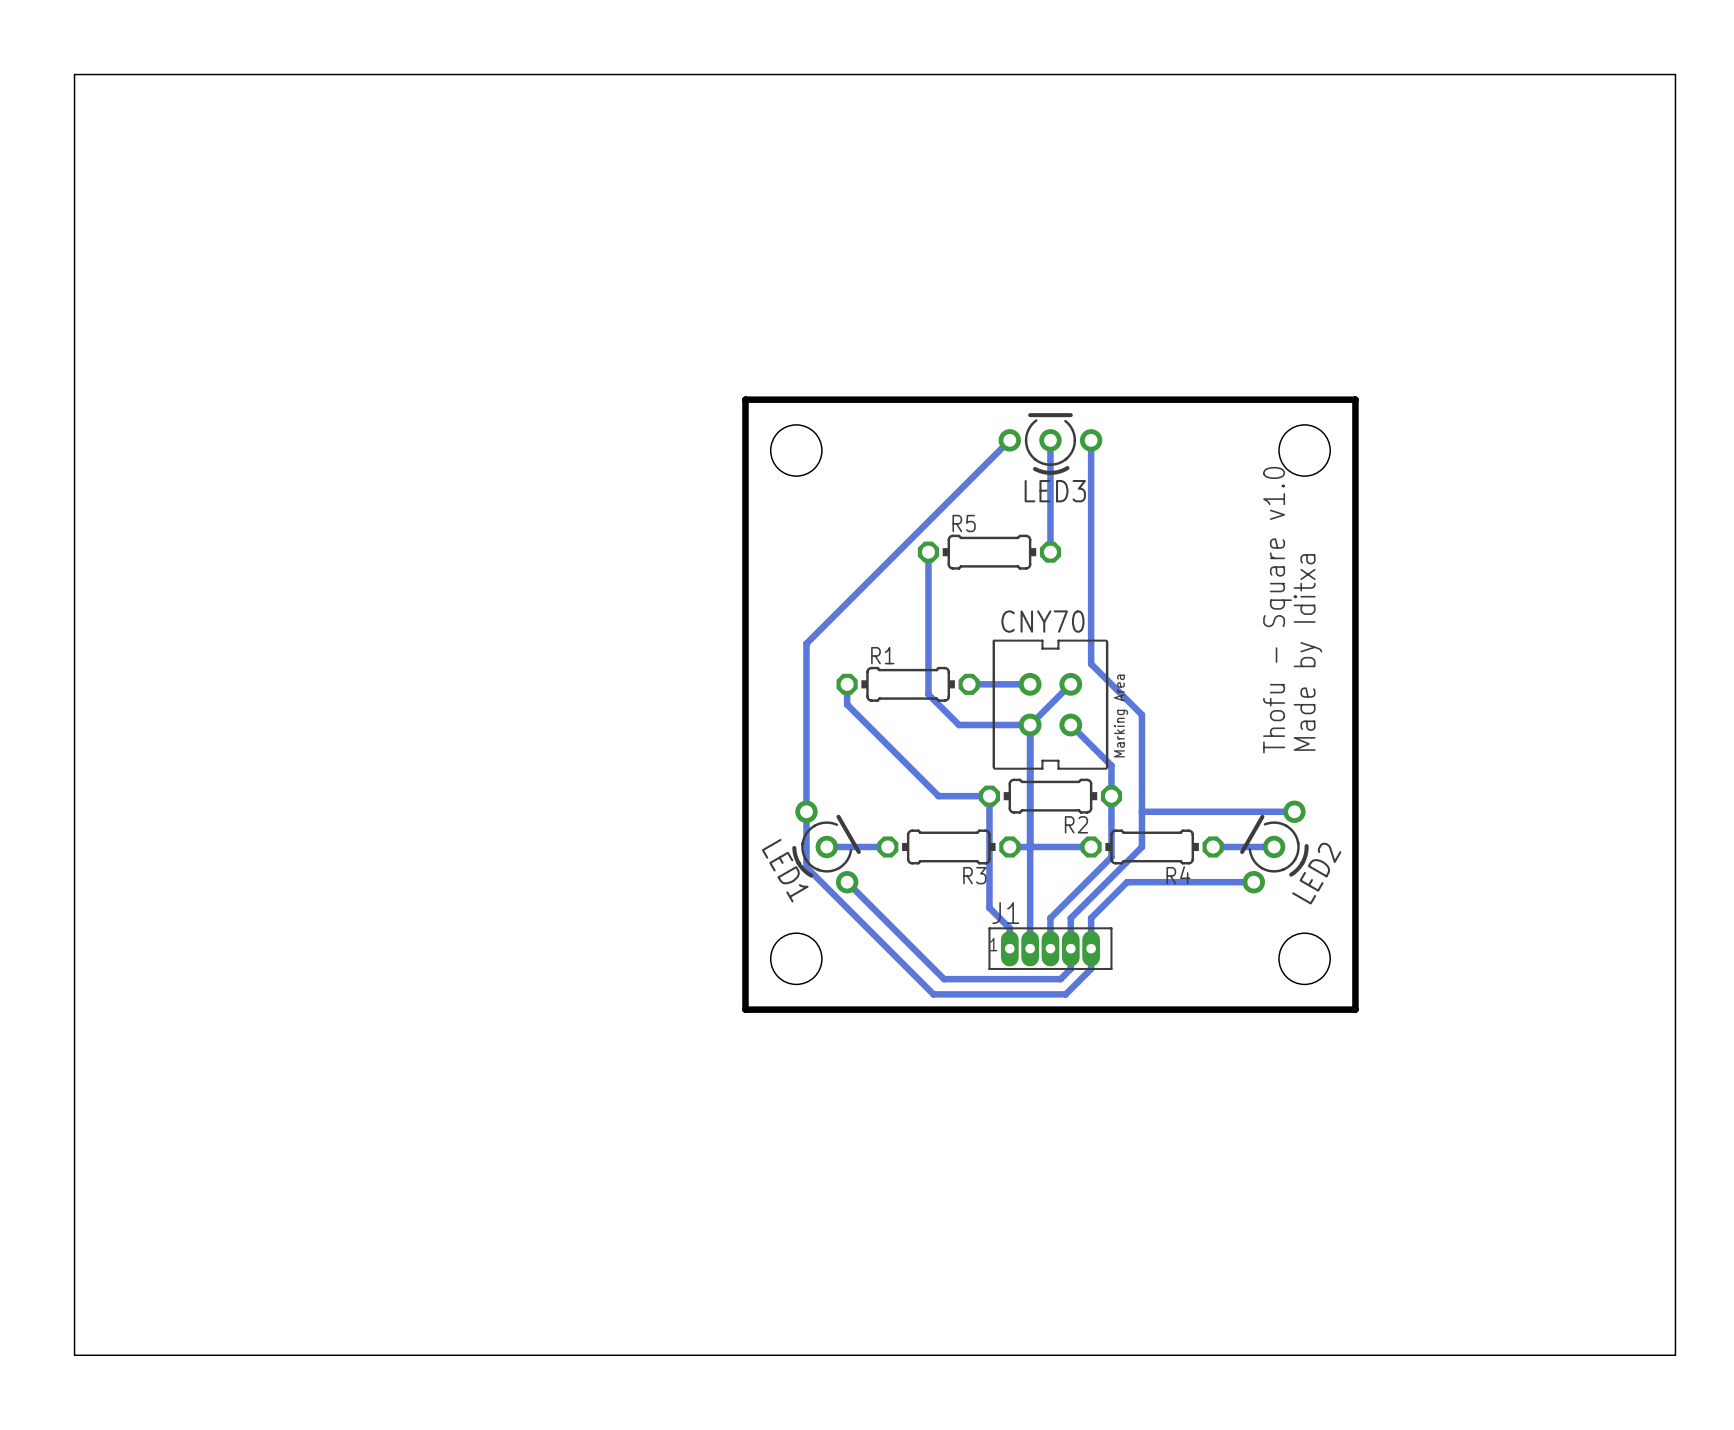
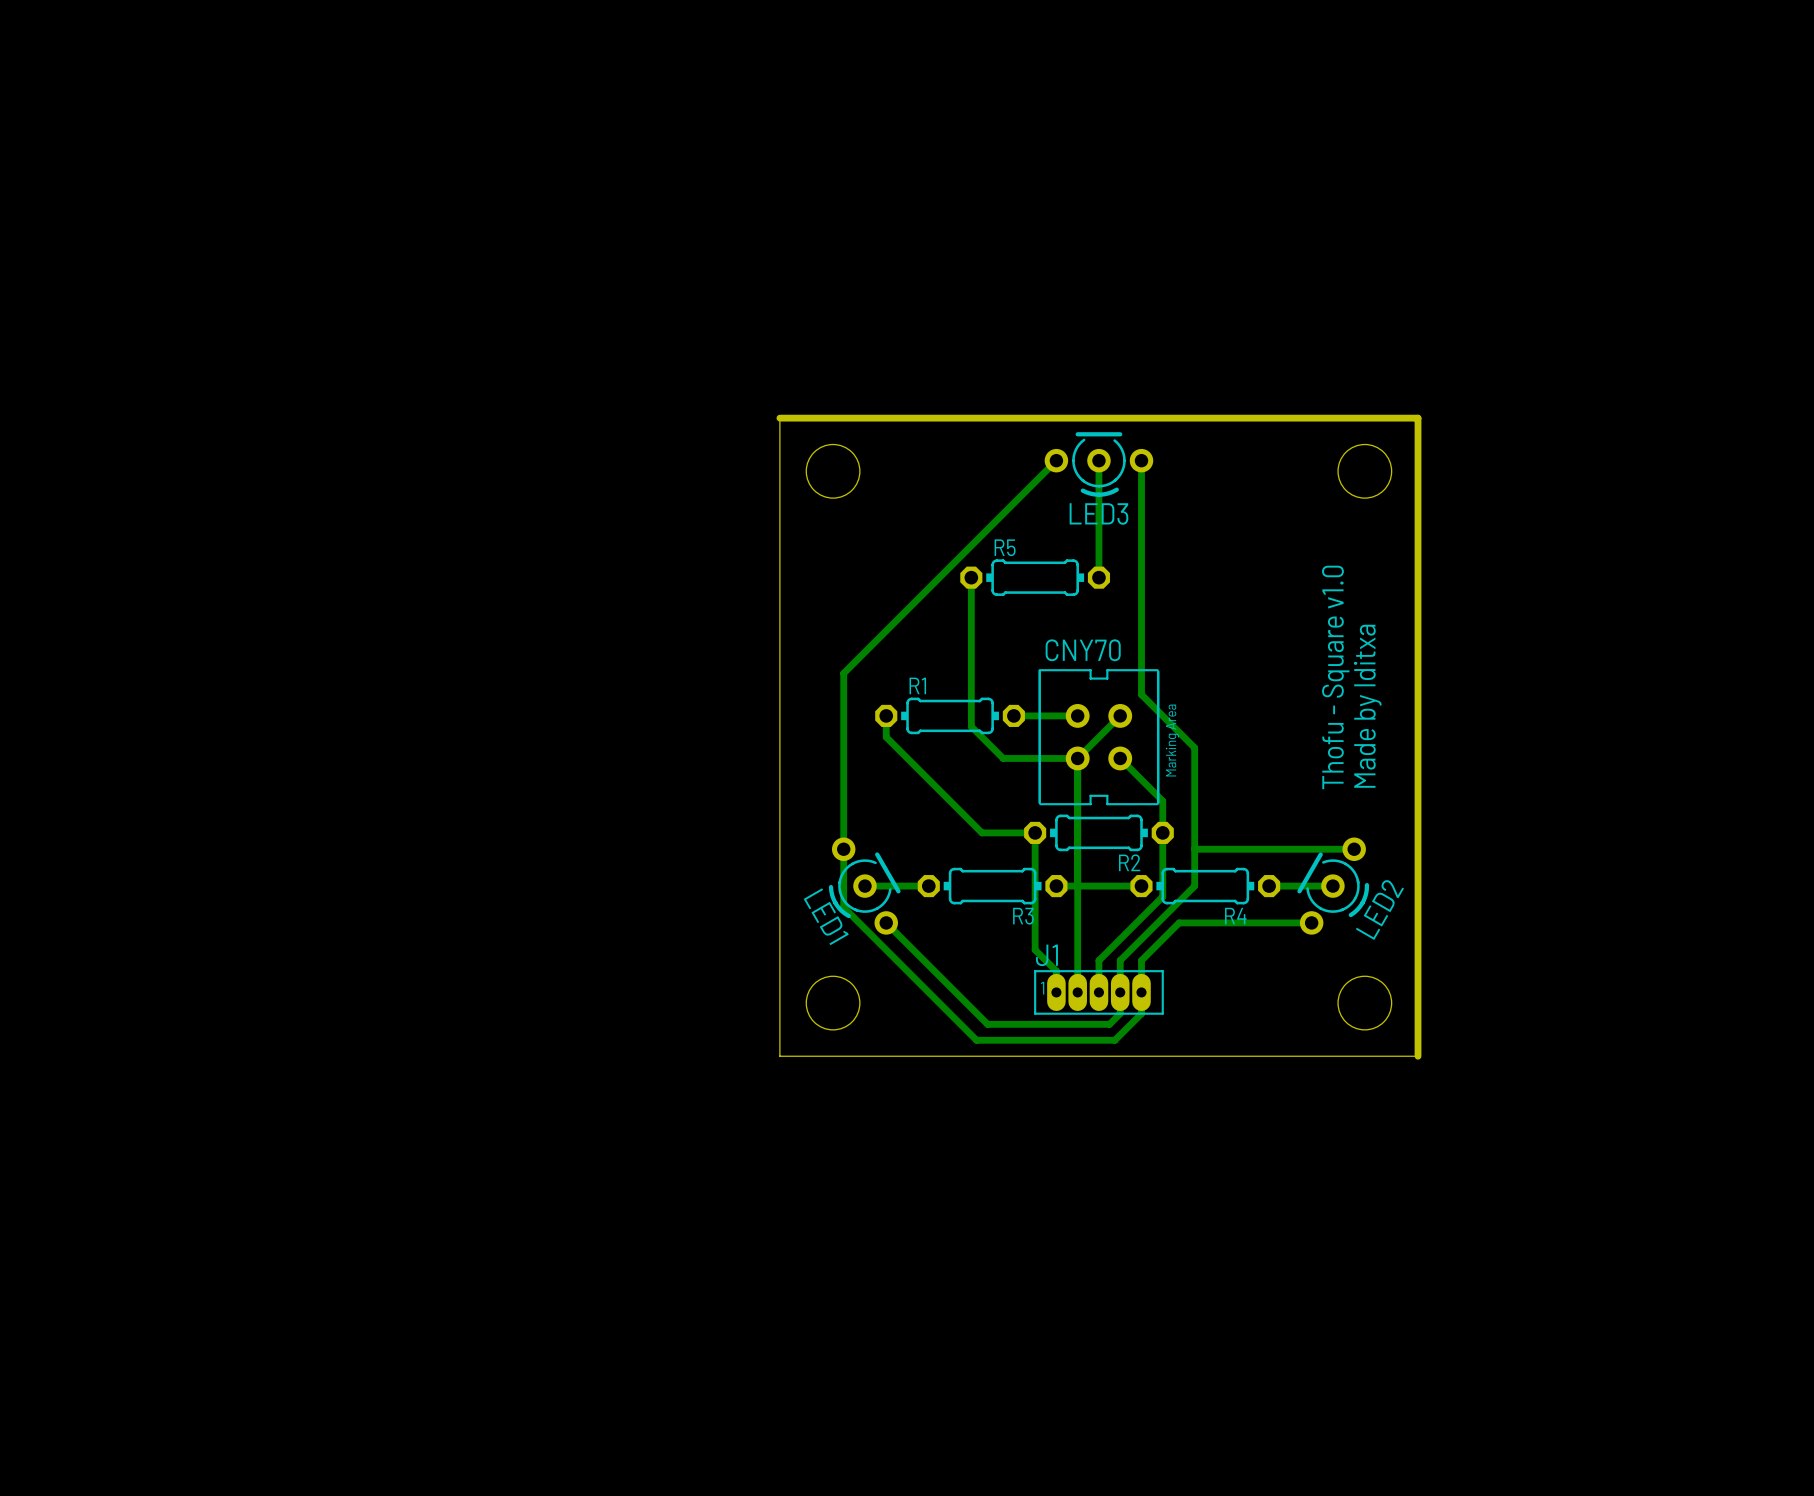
board edge: (74, 74) (1675, 74) (1675, 1355) (74, 1355) (74, 74) -> none
board edge width: thick (745, 399) (745, 1009) (1355, 1009) -> thin (779, 418) (779, 1056) (1418, 1056)

